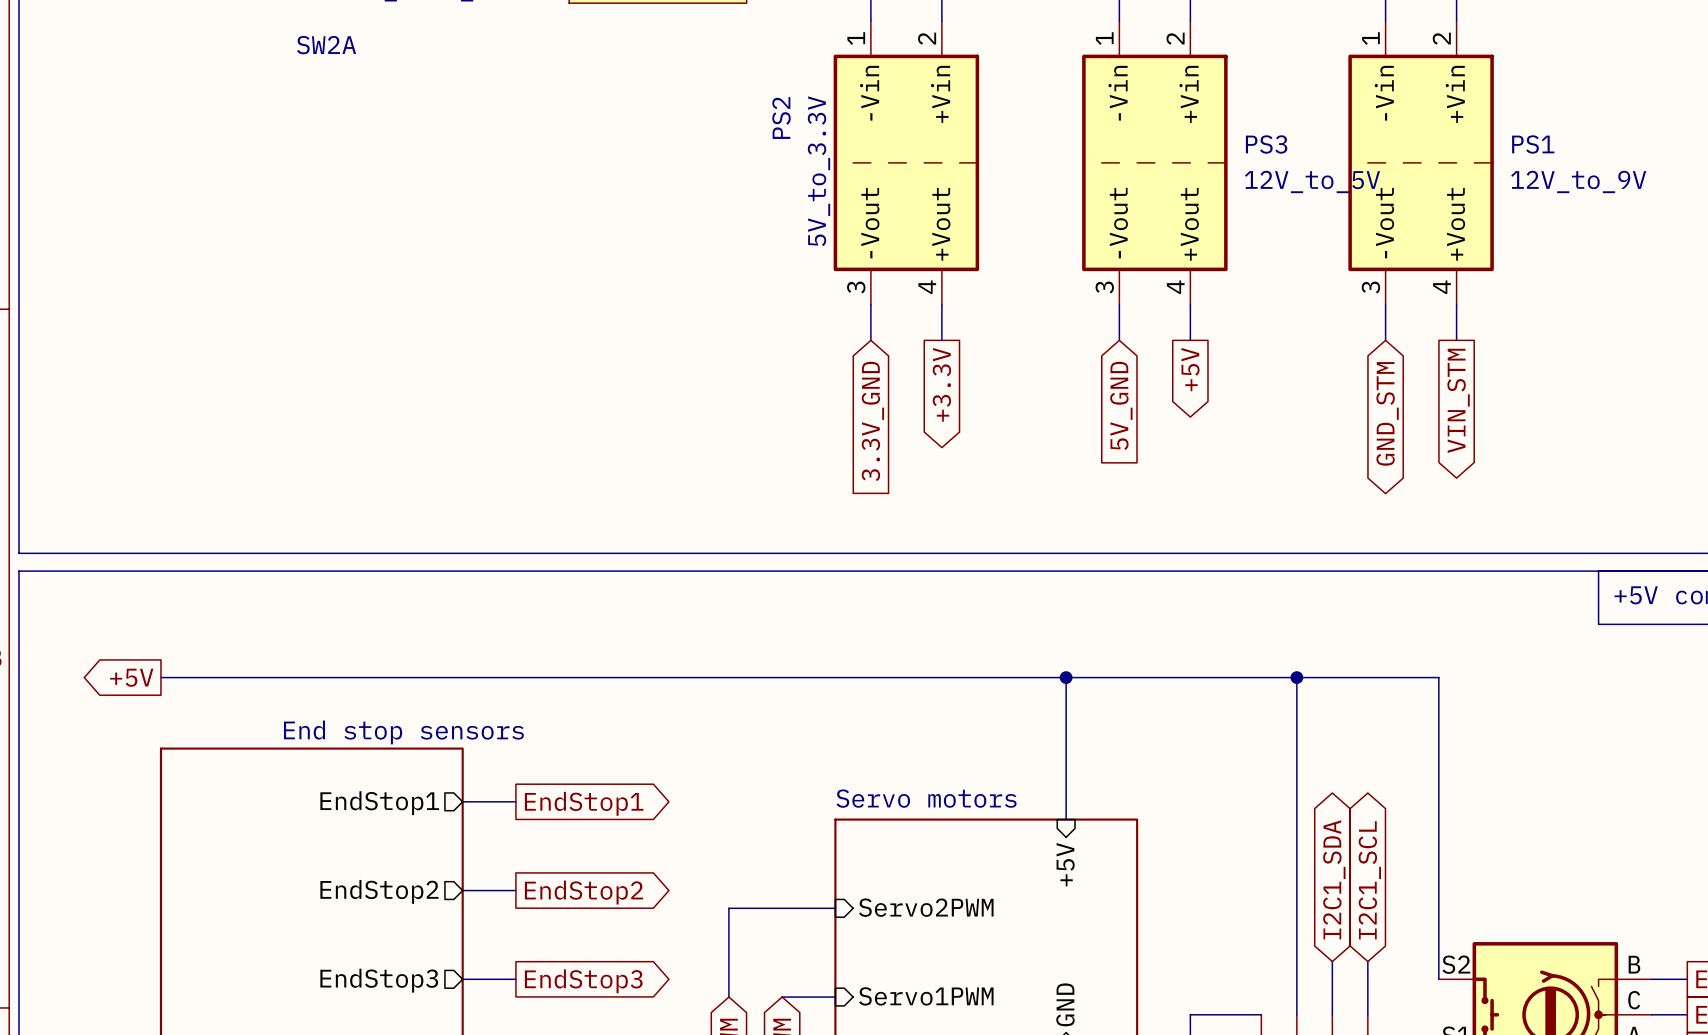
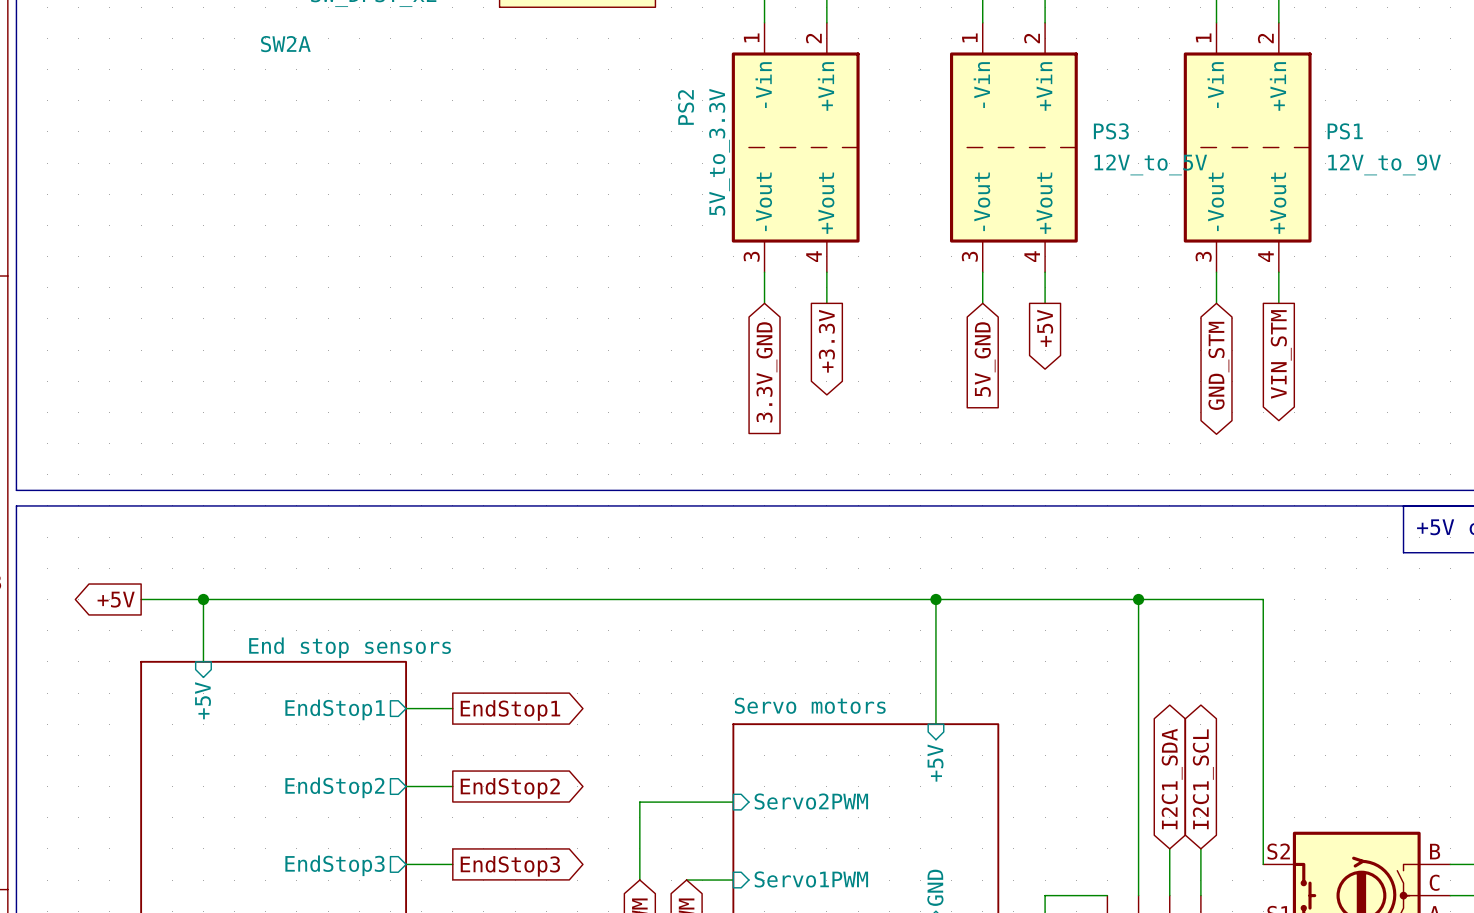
wire: none -> (203, 599) (203, 661)
junction: none -> (203, 599)
sheet pin: none -> +5V (203, 700)

